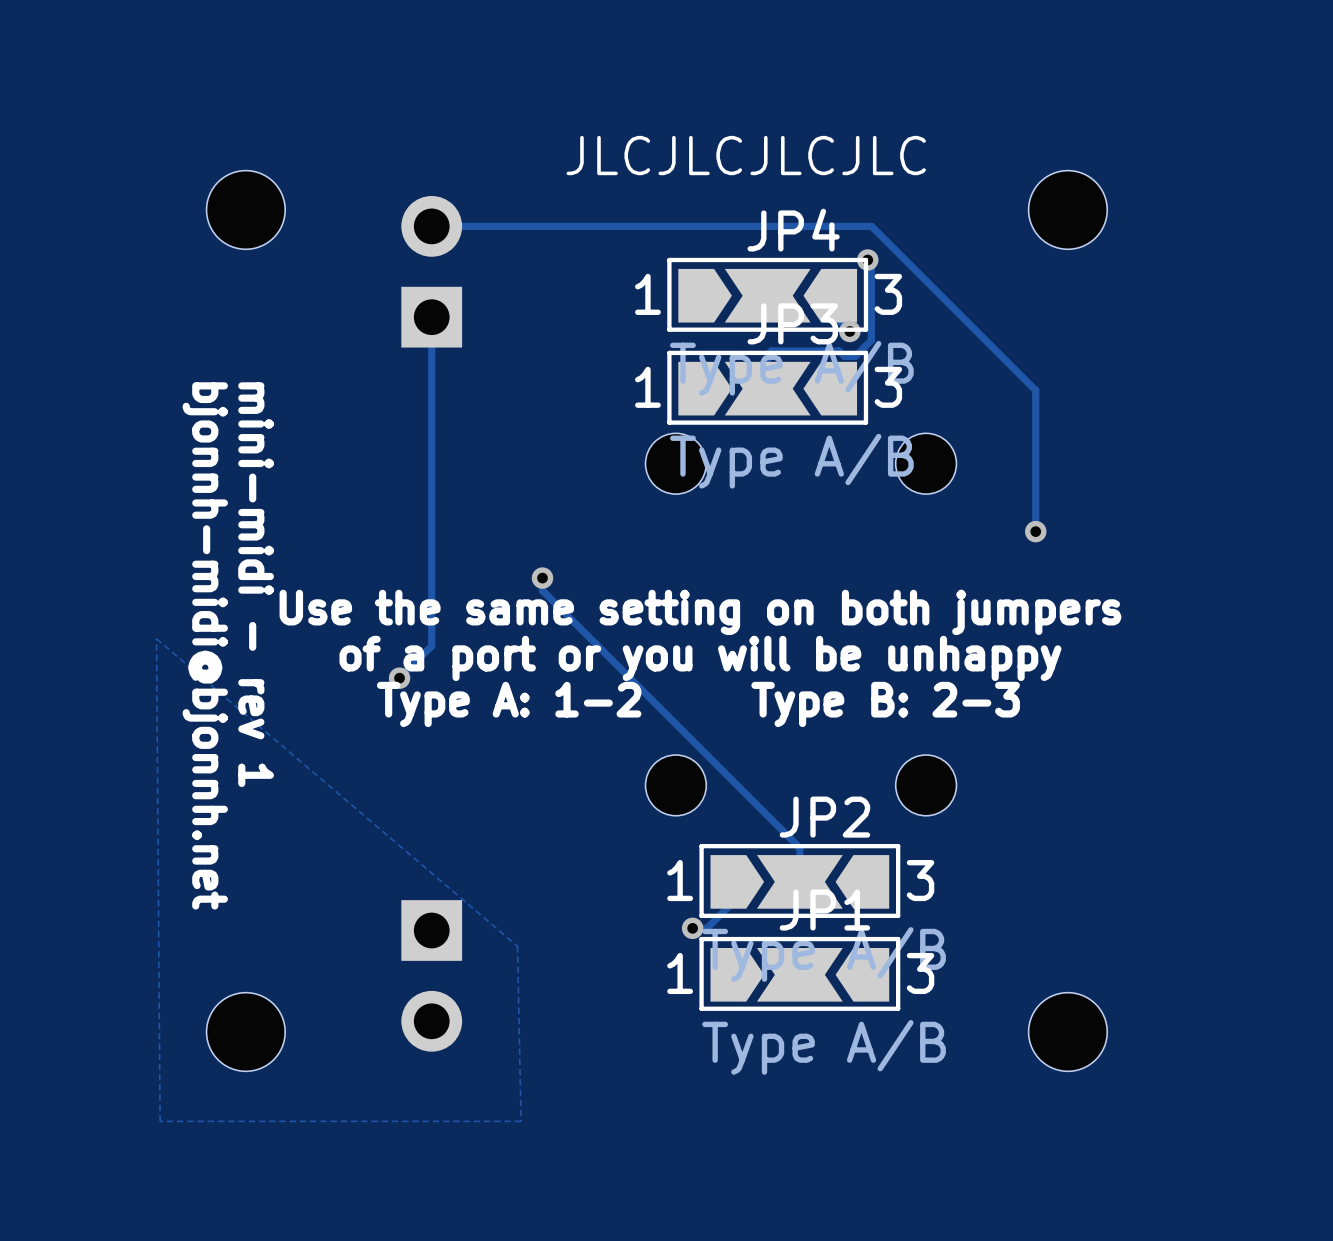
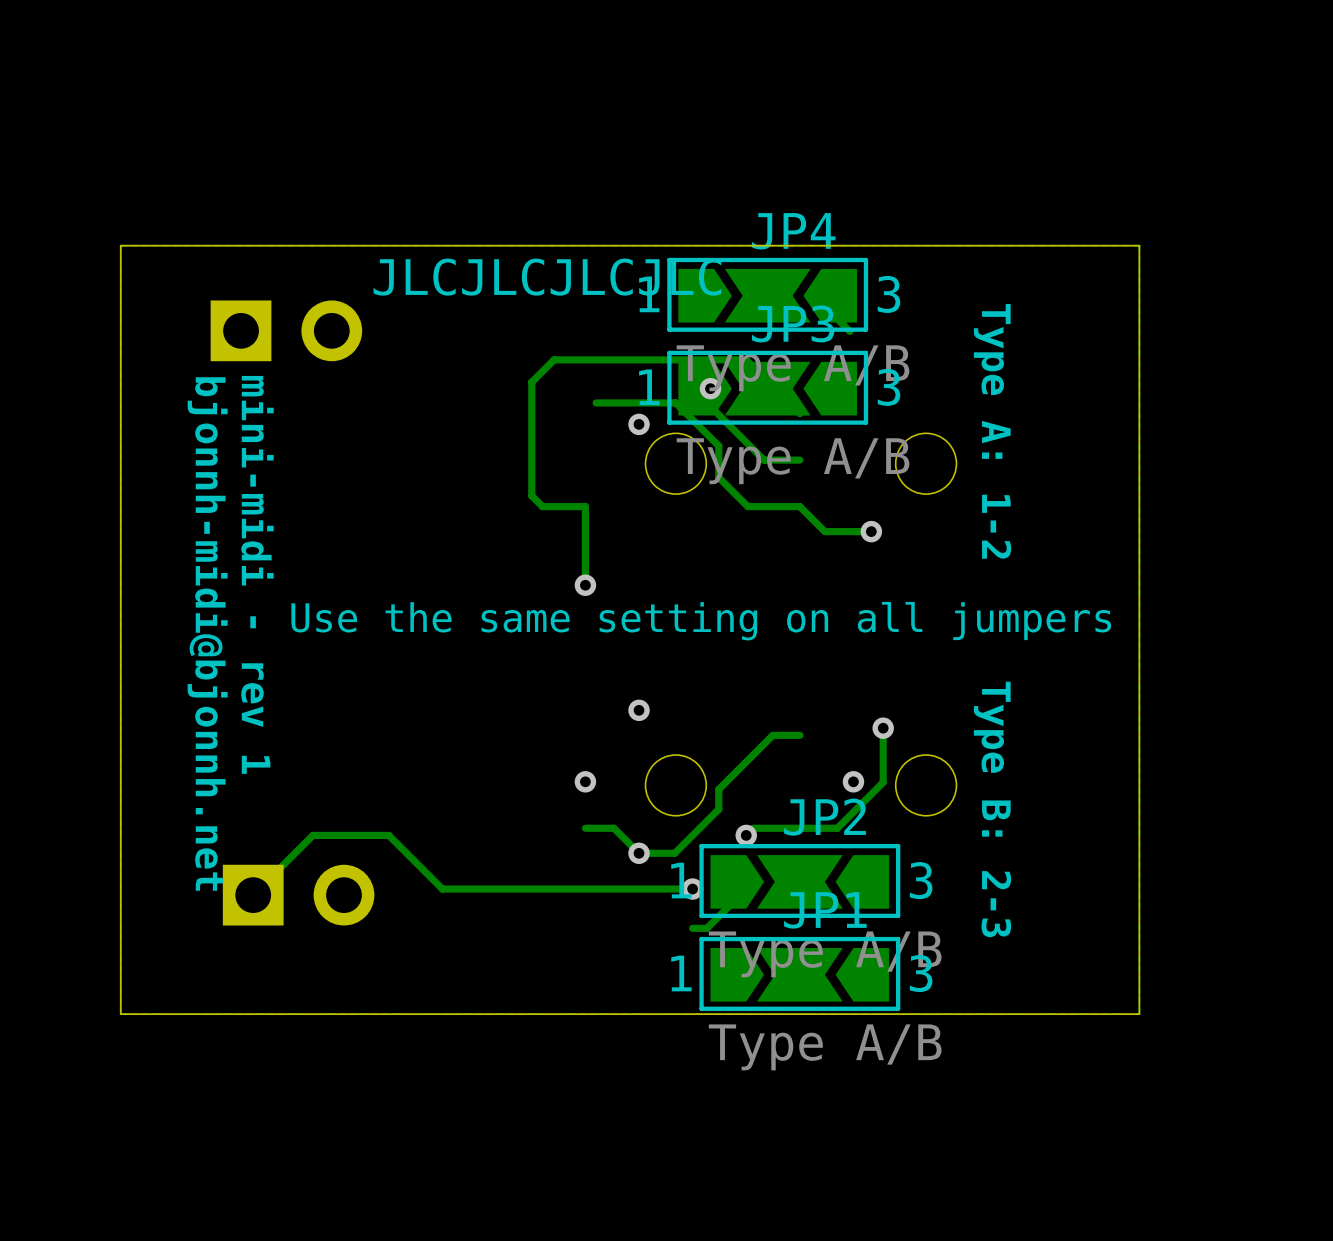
text position: JLCJLCJLCJLC (746, 155) -> JLCJLCJLCJLC (547, 277)
part: (245, 209) -> none
part: (1067, 209) -> none
track: (431, 226) (871, 226) (1035, 390) (1035, 531) -> none
board edge: none -> (1139, 245) (120, 245) (120, 1014) (1139, 1014) (1139, 245)
track: (867, 259) (871, 263) (871, 340) (855, 356) (844, 356) (839, 350) (771, 350) (767, 354) (767, 388) -> none
via: (867, 259) -> none
part rotation: 0° (431, 271) -> 90° clockwise (286, 330)
part position: (431, 271) -> (286, 330)
track: (431, 317) (431, 645) (399, 678) -> none
via: (849, 331) -> none
track: none -> (710, 388) (710, 406) (764, 460) (799, 460)
via: none -> (710, 388)
track: none -> (596, 402) (675, 402) (718, 445) (718, 477) (747, 506) (799, 506) (824, 531) (871, 531)
track: none -> (799, 413) (746, 359) (554, 359) (531, 382) (531, 495) (542, 506) (585, 506) (585, 585)
via: none -> (639, 424)
via: none -> (871, 531)
via: (1035, 531) -> none
track: (542, 578) (542, 590) (799, 847) (799, 881) -> none
via position: (542, 578) -> (585, 585)
text: Use the same setting on both jumpers (700, 612) -> Use the same setting on all jumpers (701, 621)
zone outline: (156, 638) (517, 946) (521, 1121) (160, 1121) (156, 638) -> none
text: of a port or you will be unhappy (700, 658) -> none
via: (399, 678) -> none
text rotation: 0° (698, 704) -> 90° clockwise (992, 620)
via: none -> (639, 710)
track: none -> (883, 728) (883, 782) (837, 828) (753, 828) (746, 835)
via: none -> (883, 728)
track: none -> (799, 735) (772, 735) (718, 789) (718, 809) (674, 853) (639, 853) (614, 828) (585, 828)
via: none -> (585, 781)
via: none -> (853, 781)
via: none -> (746, 835)
via: none -> (639, 853)
track: none -> (692, 889) (442, 889) (388, 835) (312, 835) (253, 895)
via position: (692, 928) -> (692, 889)
part rotation: 0° (431, 975) -> 90° counterclockwise (298, 895)
part position: (431, 975) -> (298, 895)
part: (245, 1032) -> none
part: (1067, 1032) -> none

